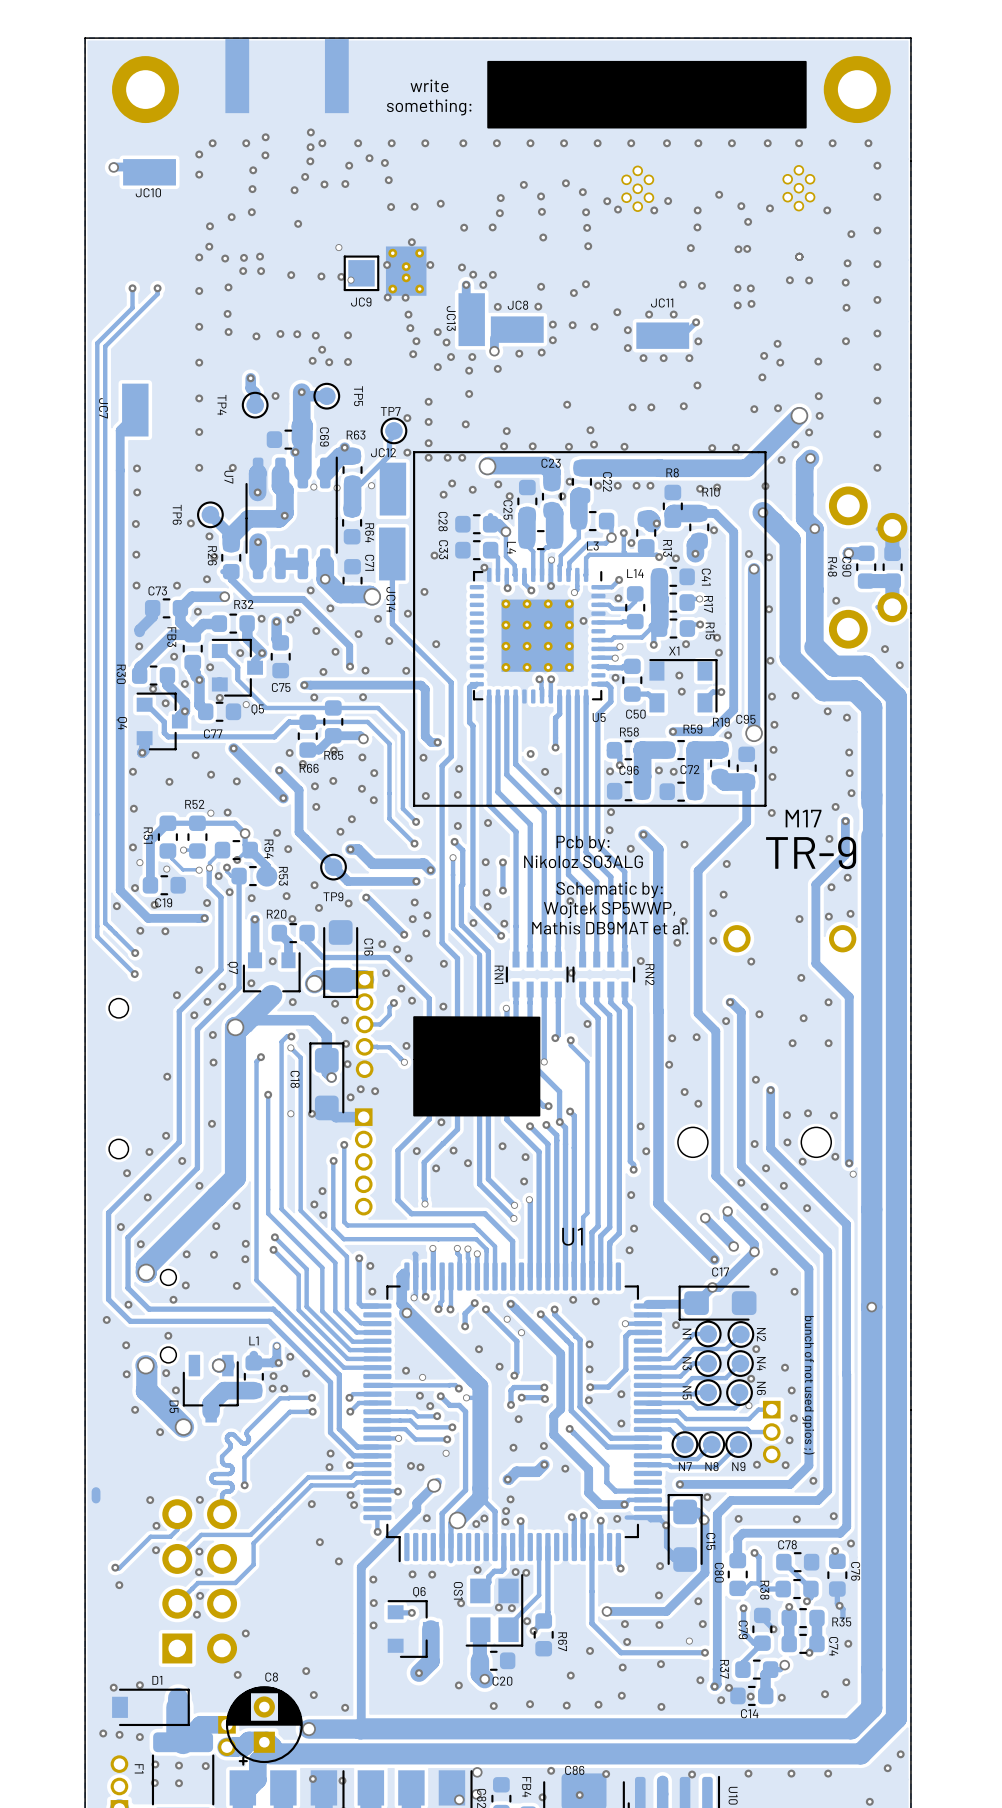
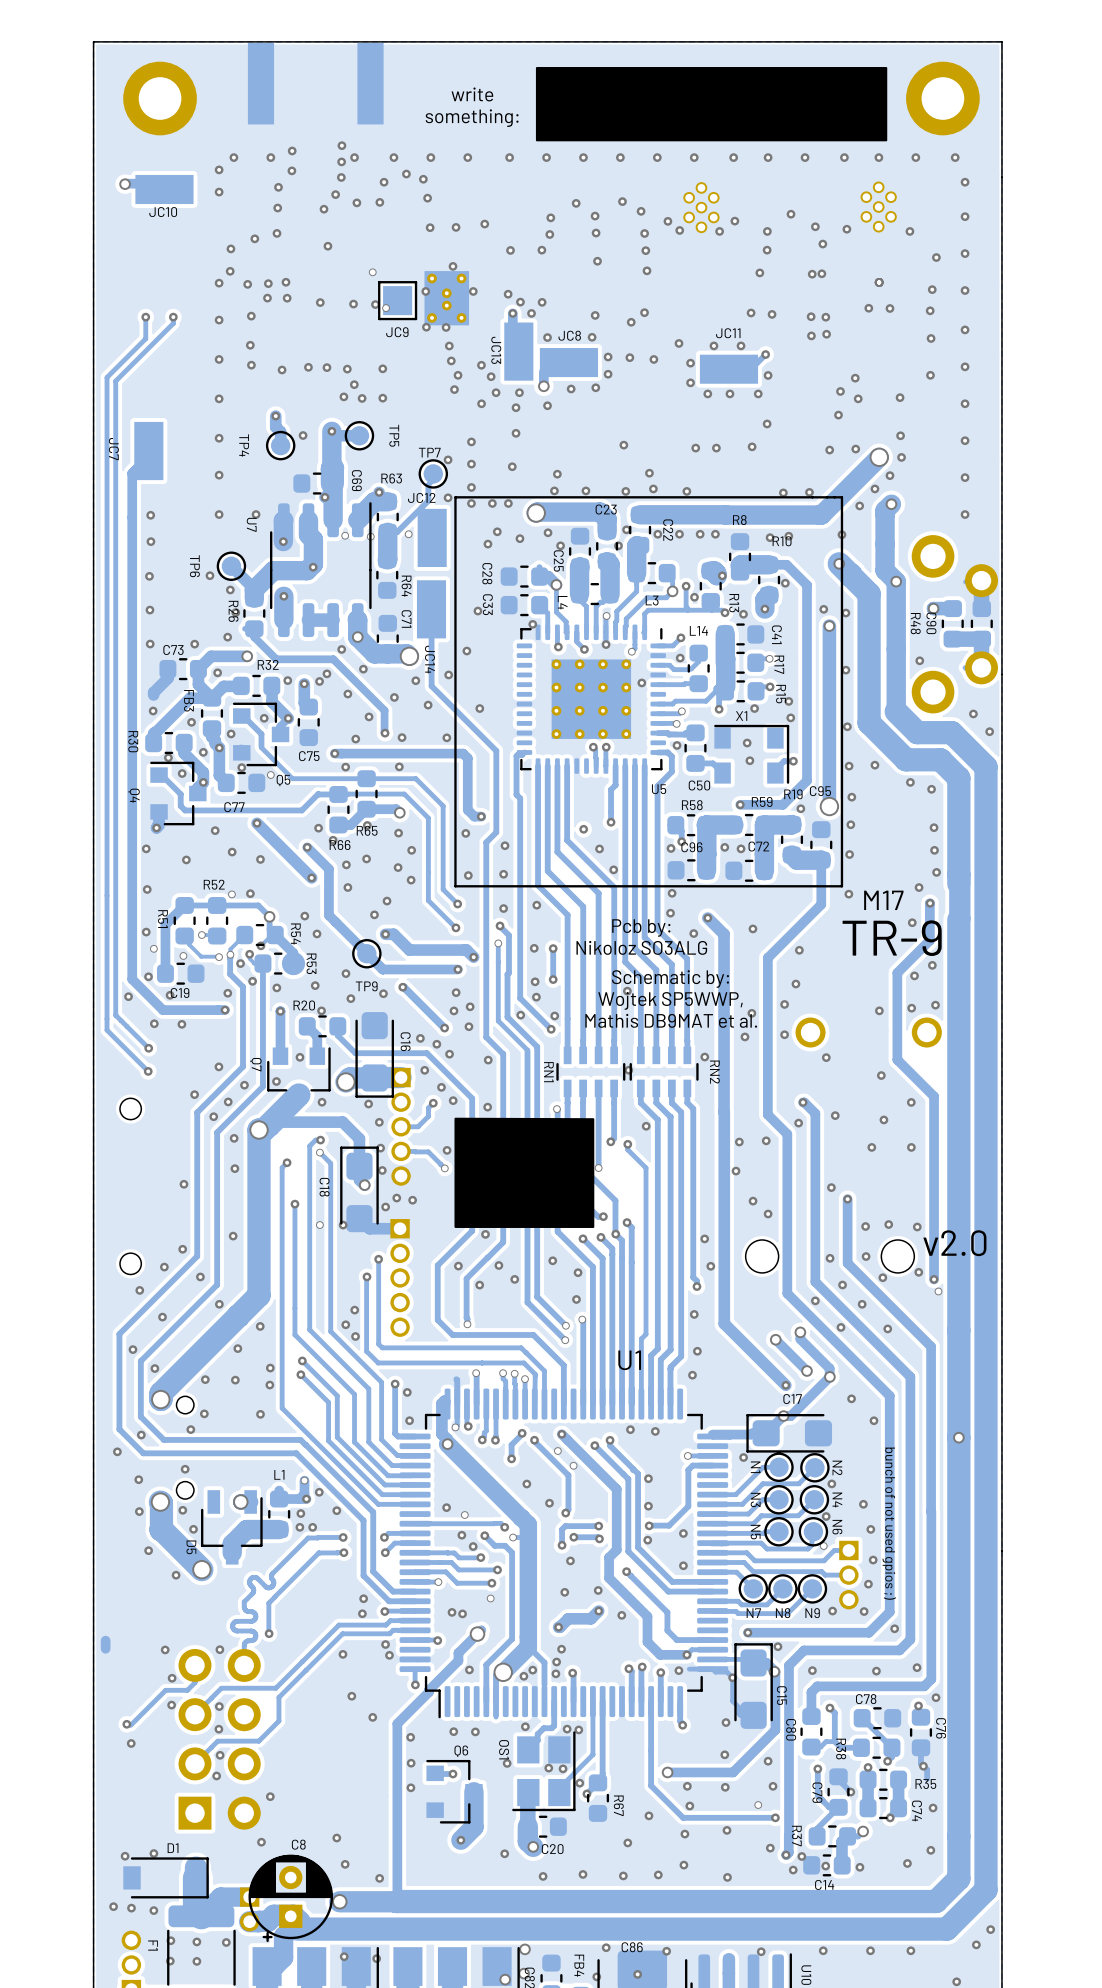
text: none -> v2.0 (954, 1243)

